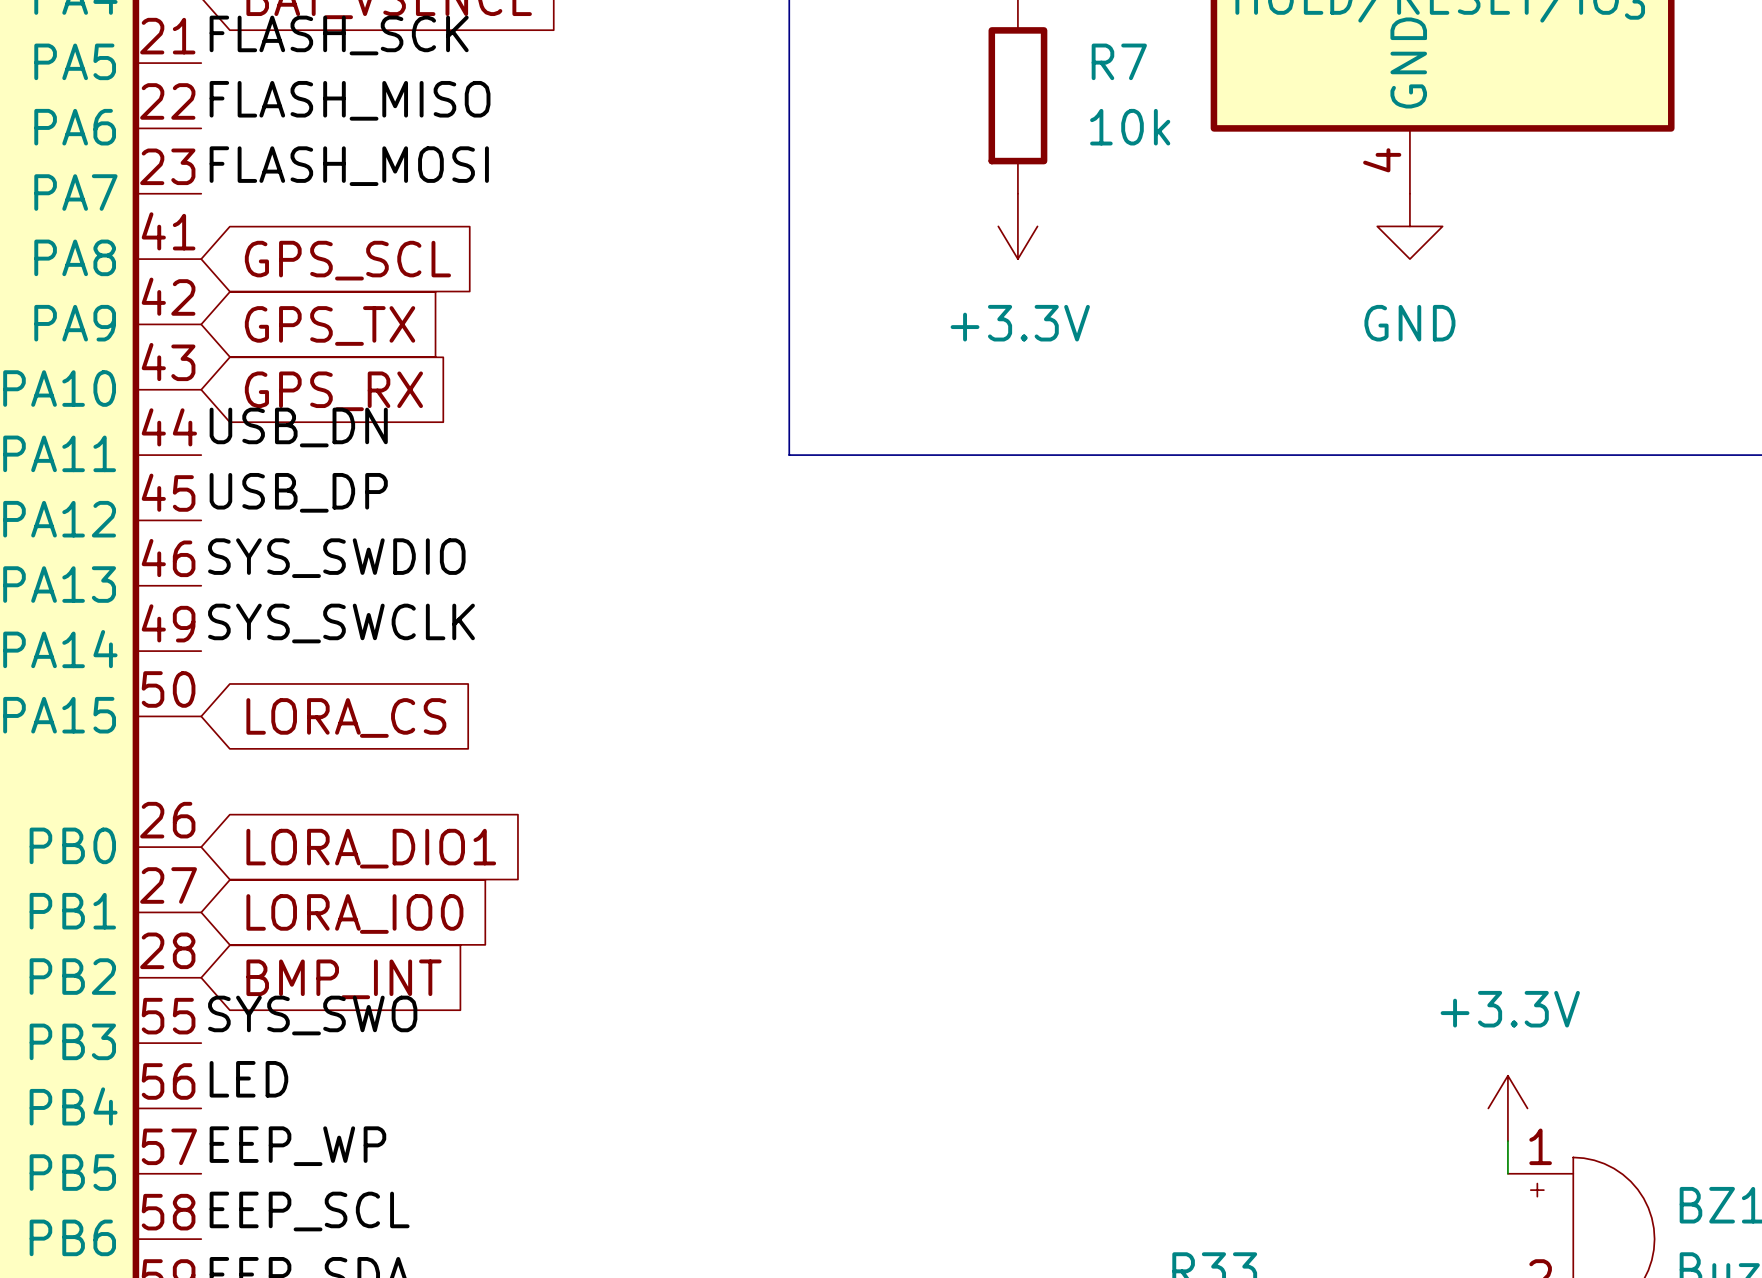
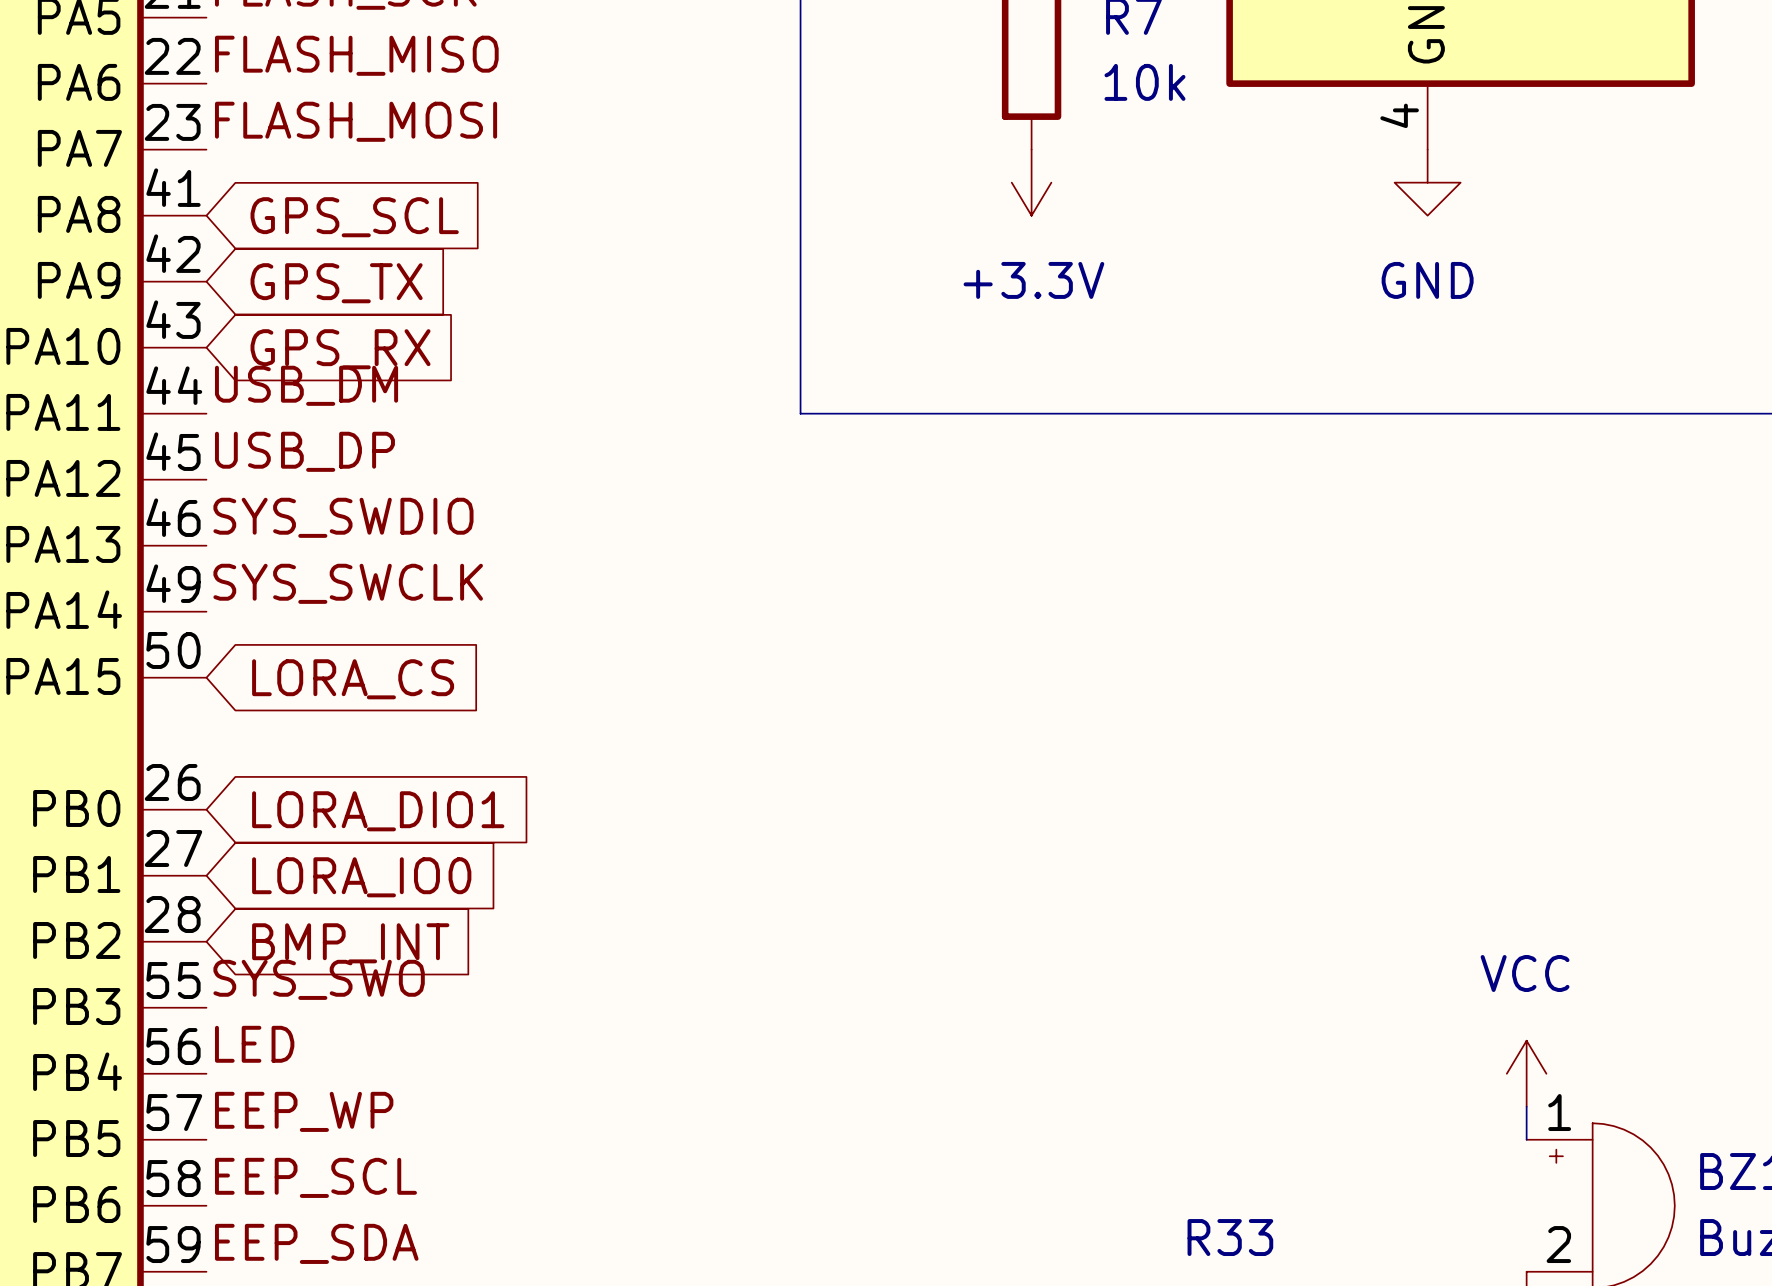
label: USB_DN (298, 427) -> USB_DM (306, 385)
power symbol: +3.3V (1507, 1108) -> VCC (1526, 1073)

